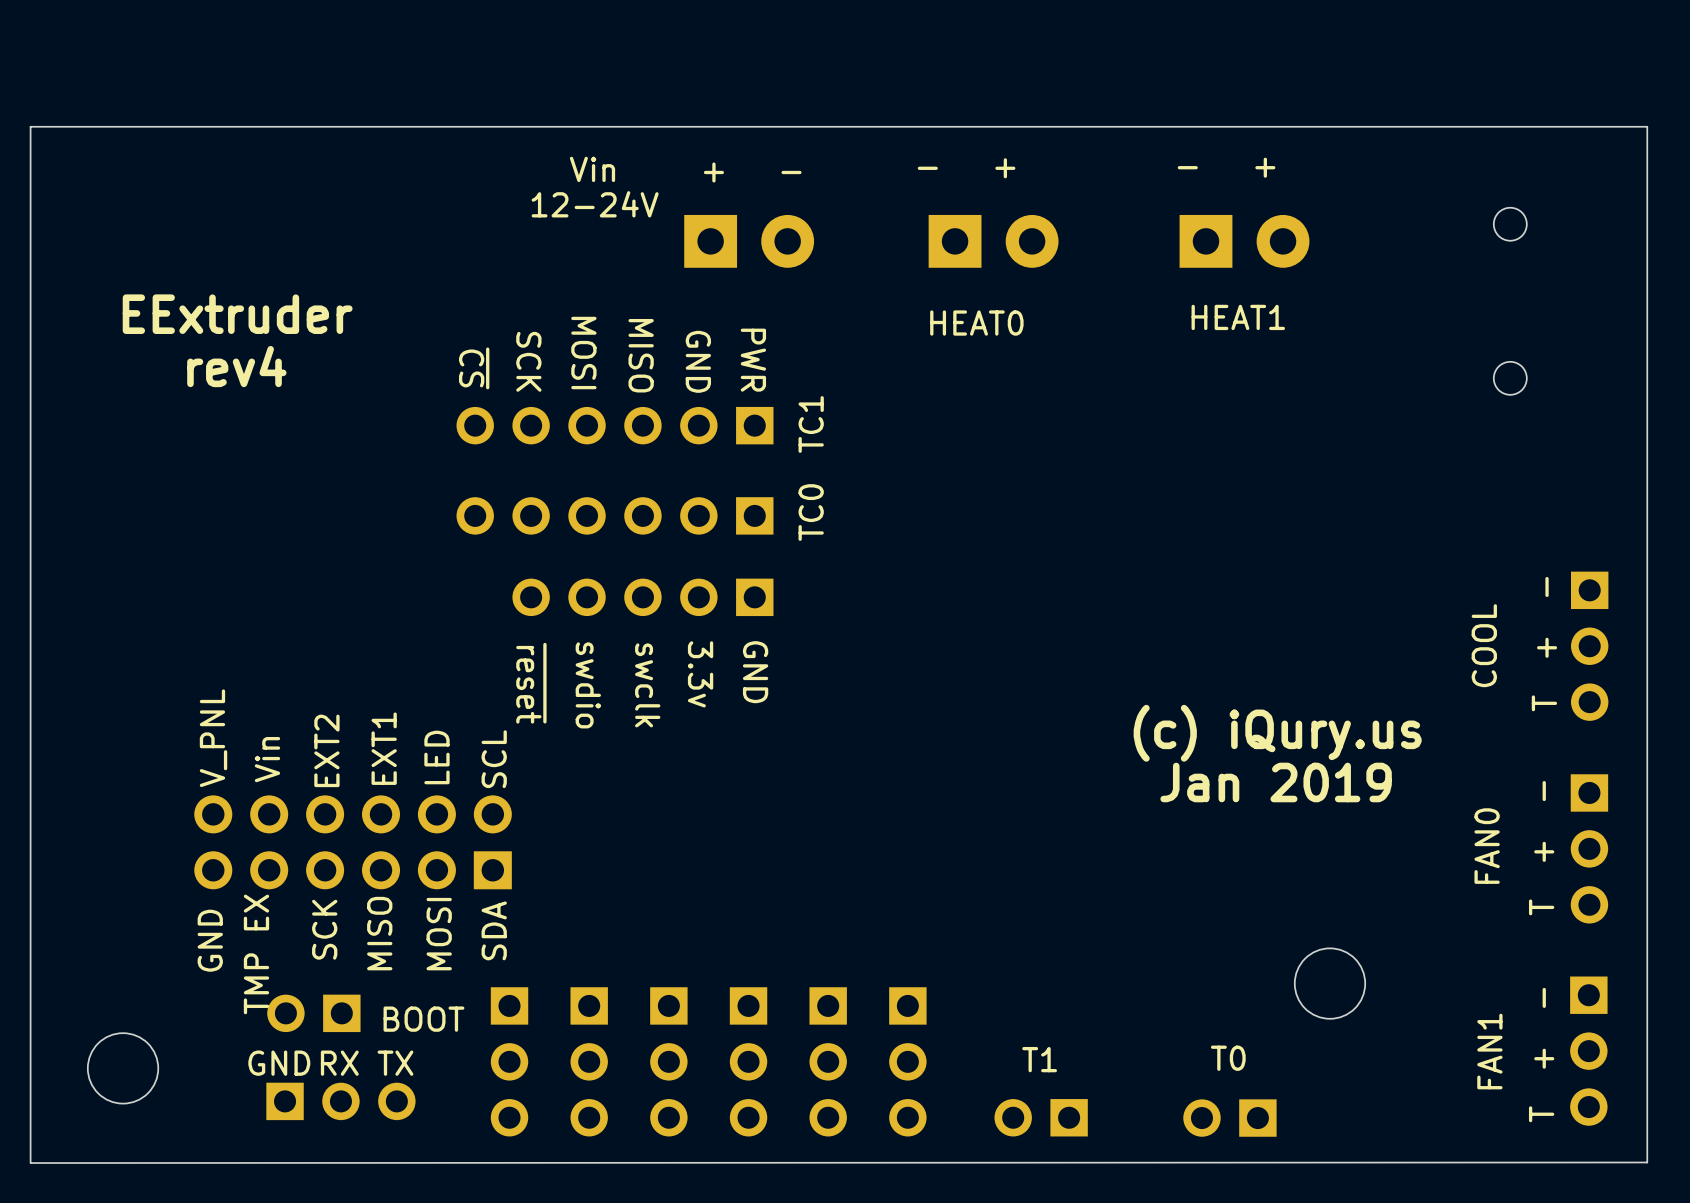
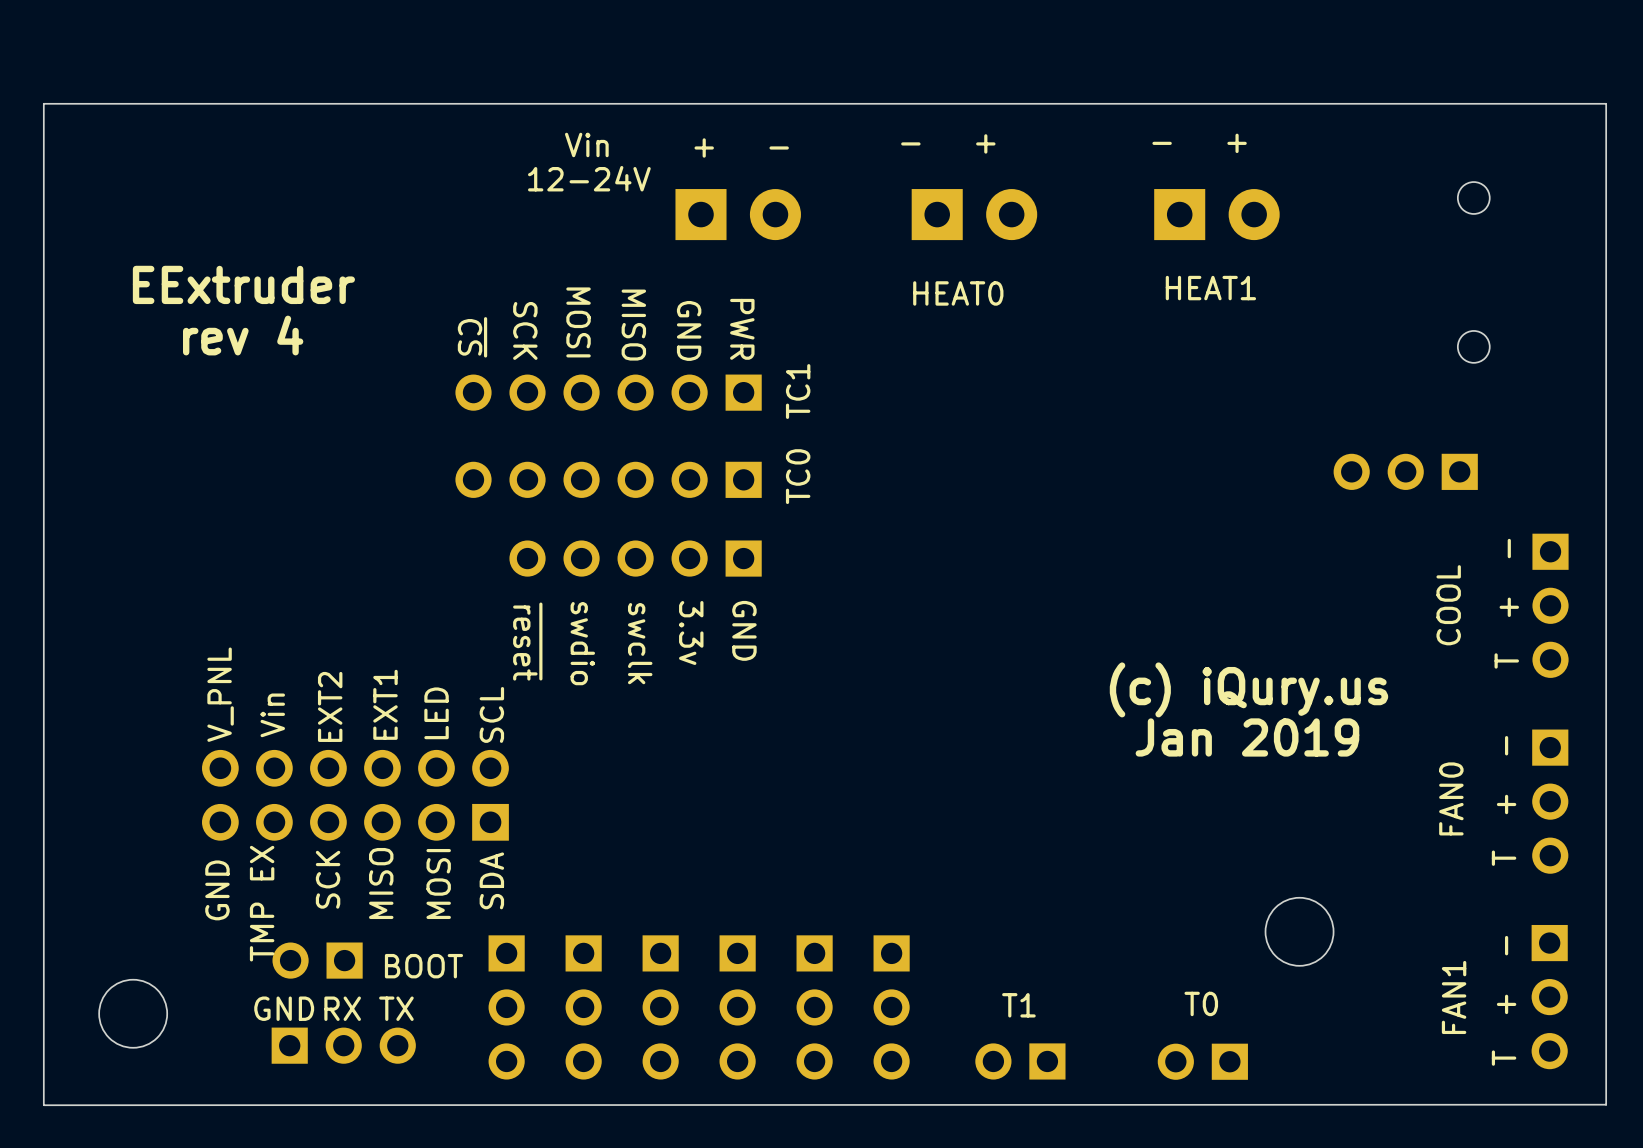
text: rev4 (236, 366) -> rev 4 (243, 335)
part: none -> (1405, 471)

